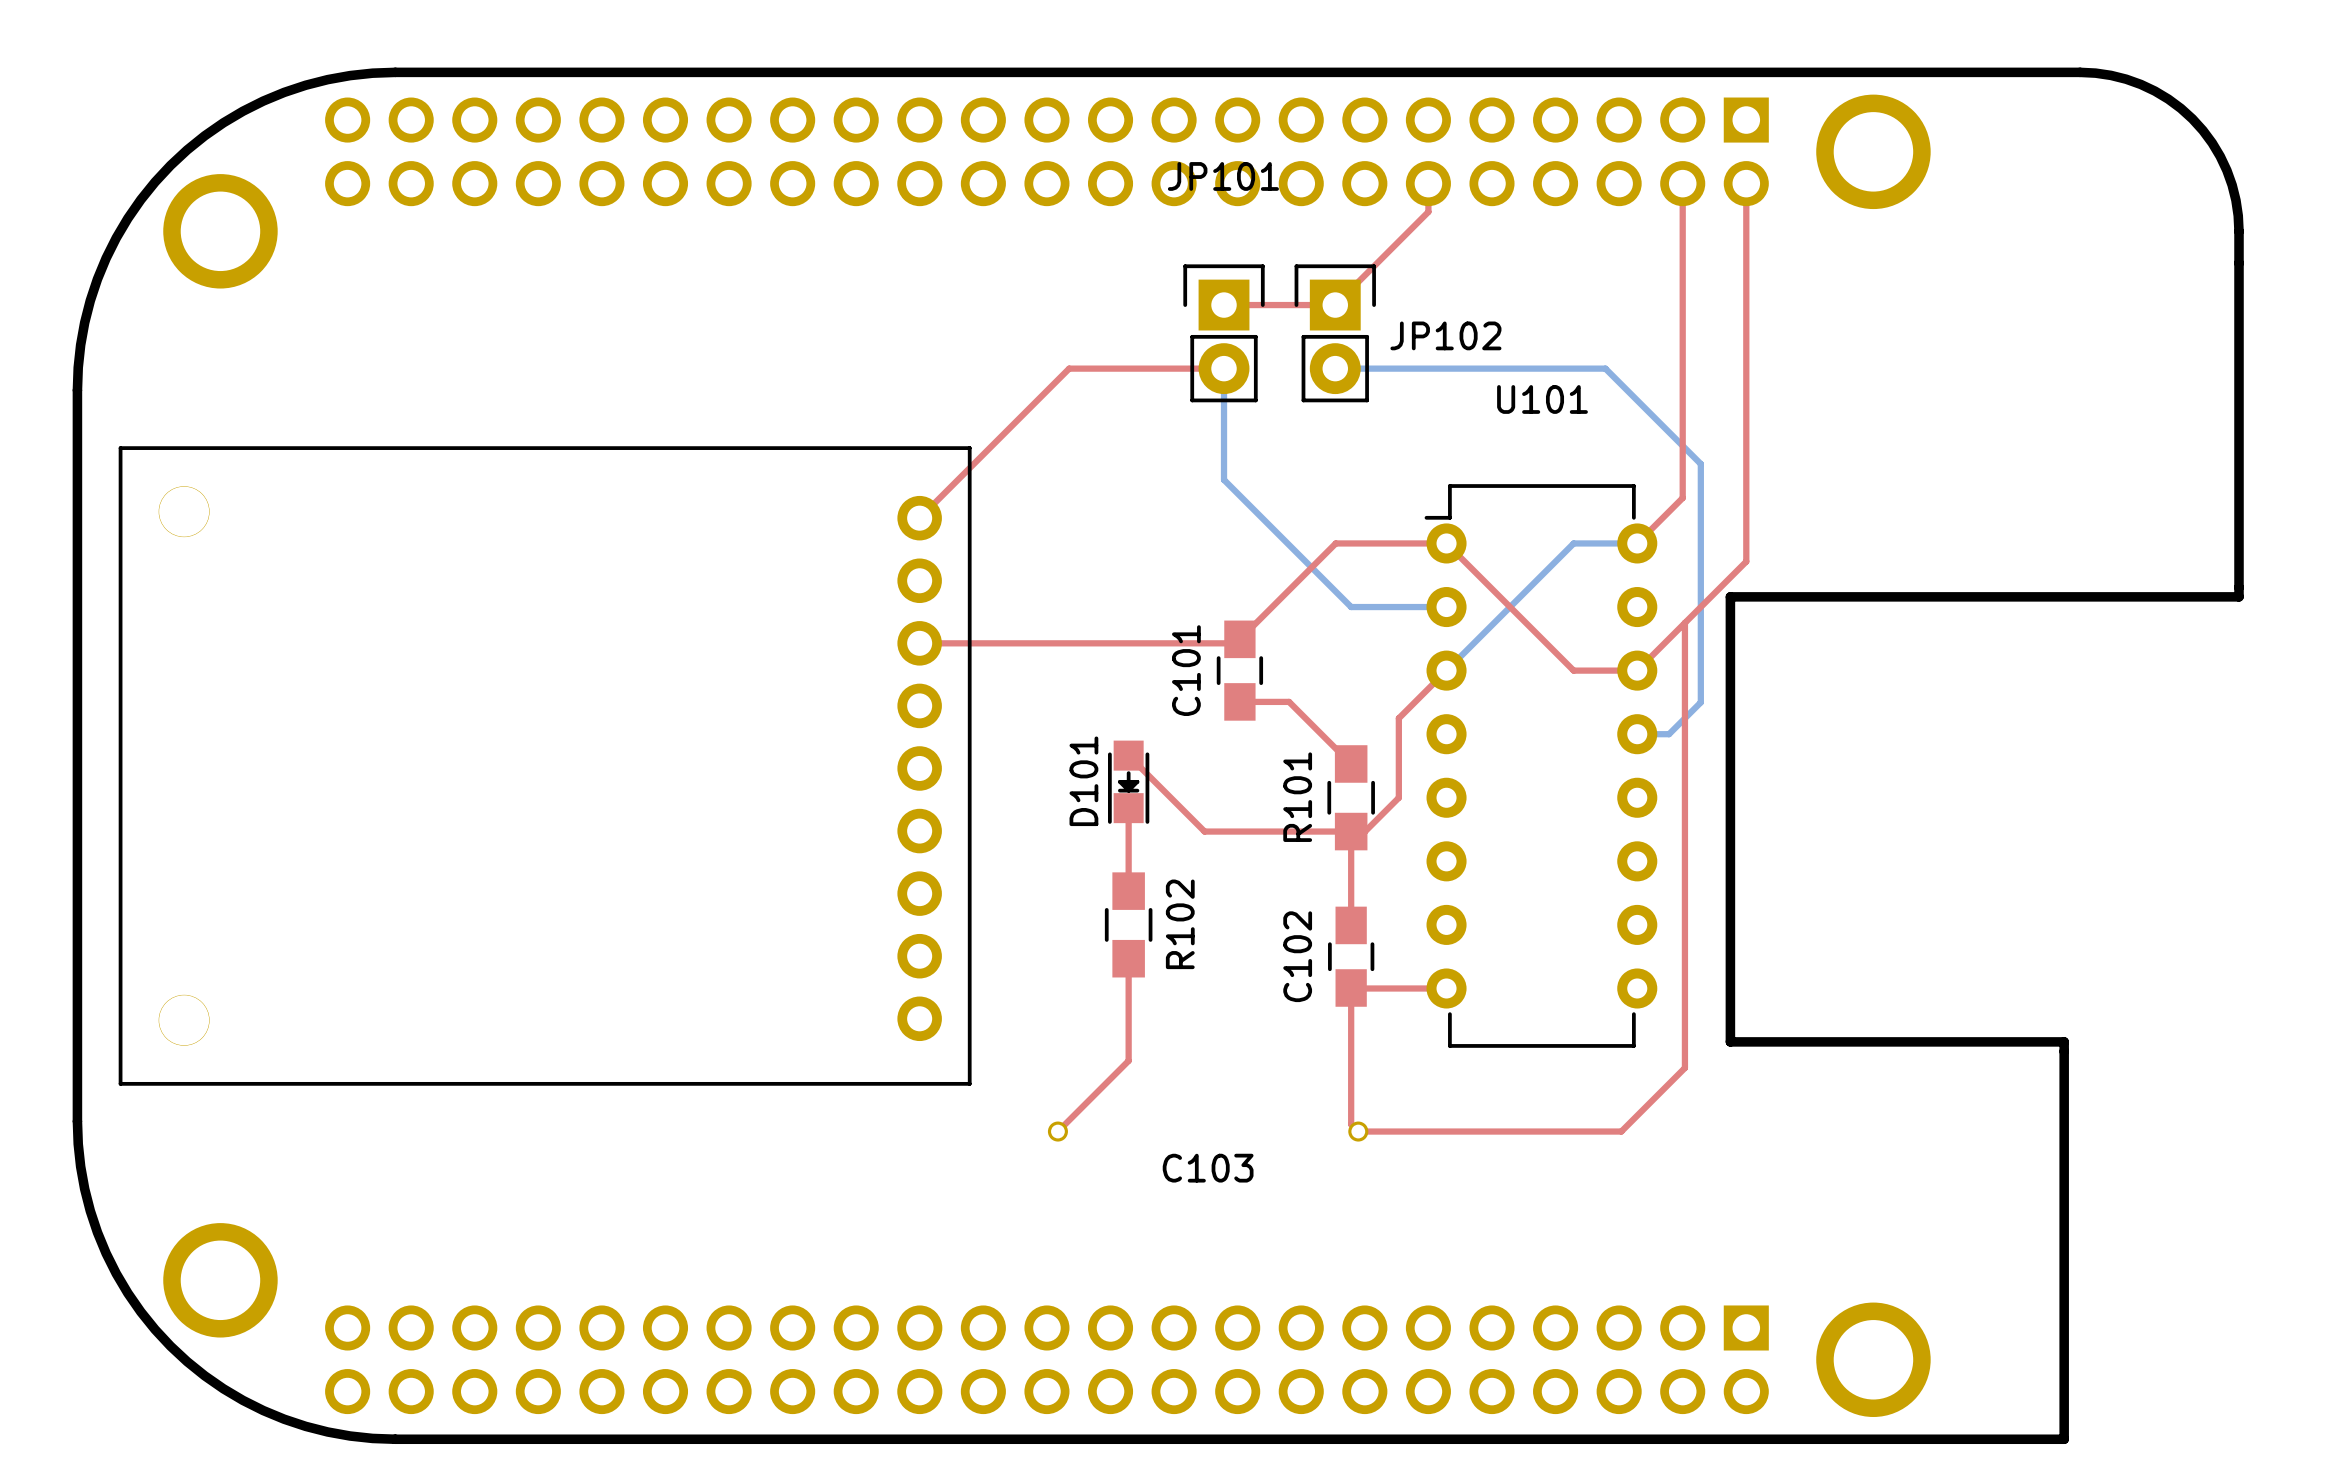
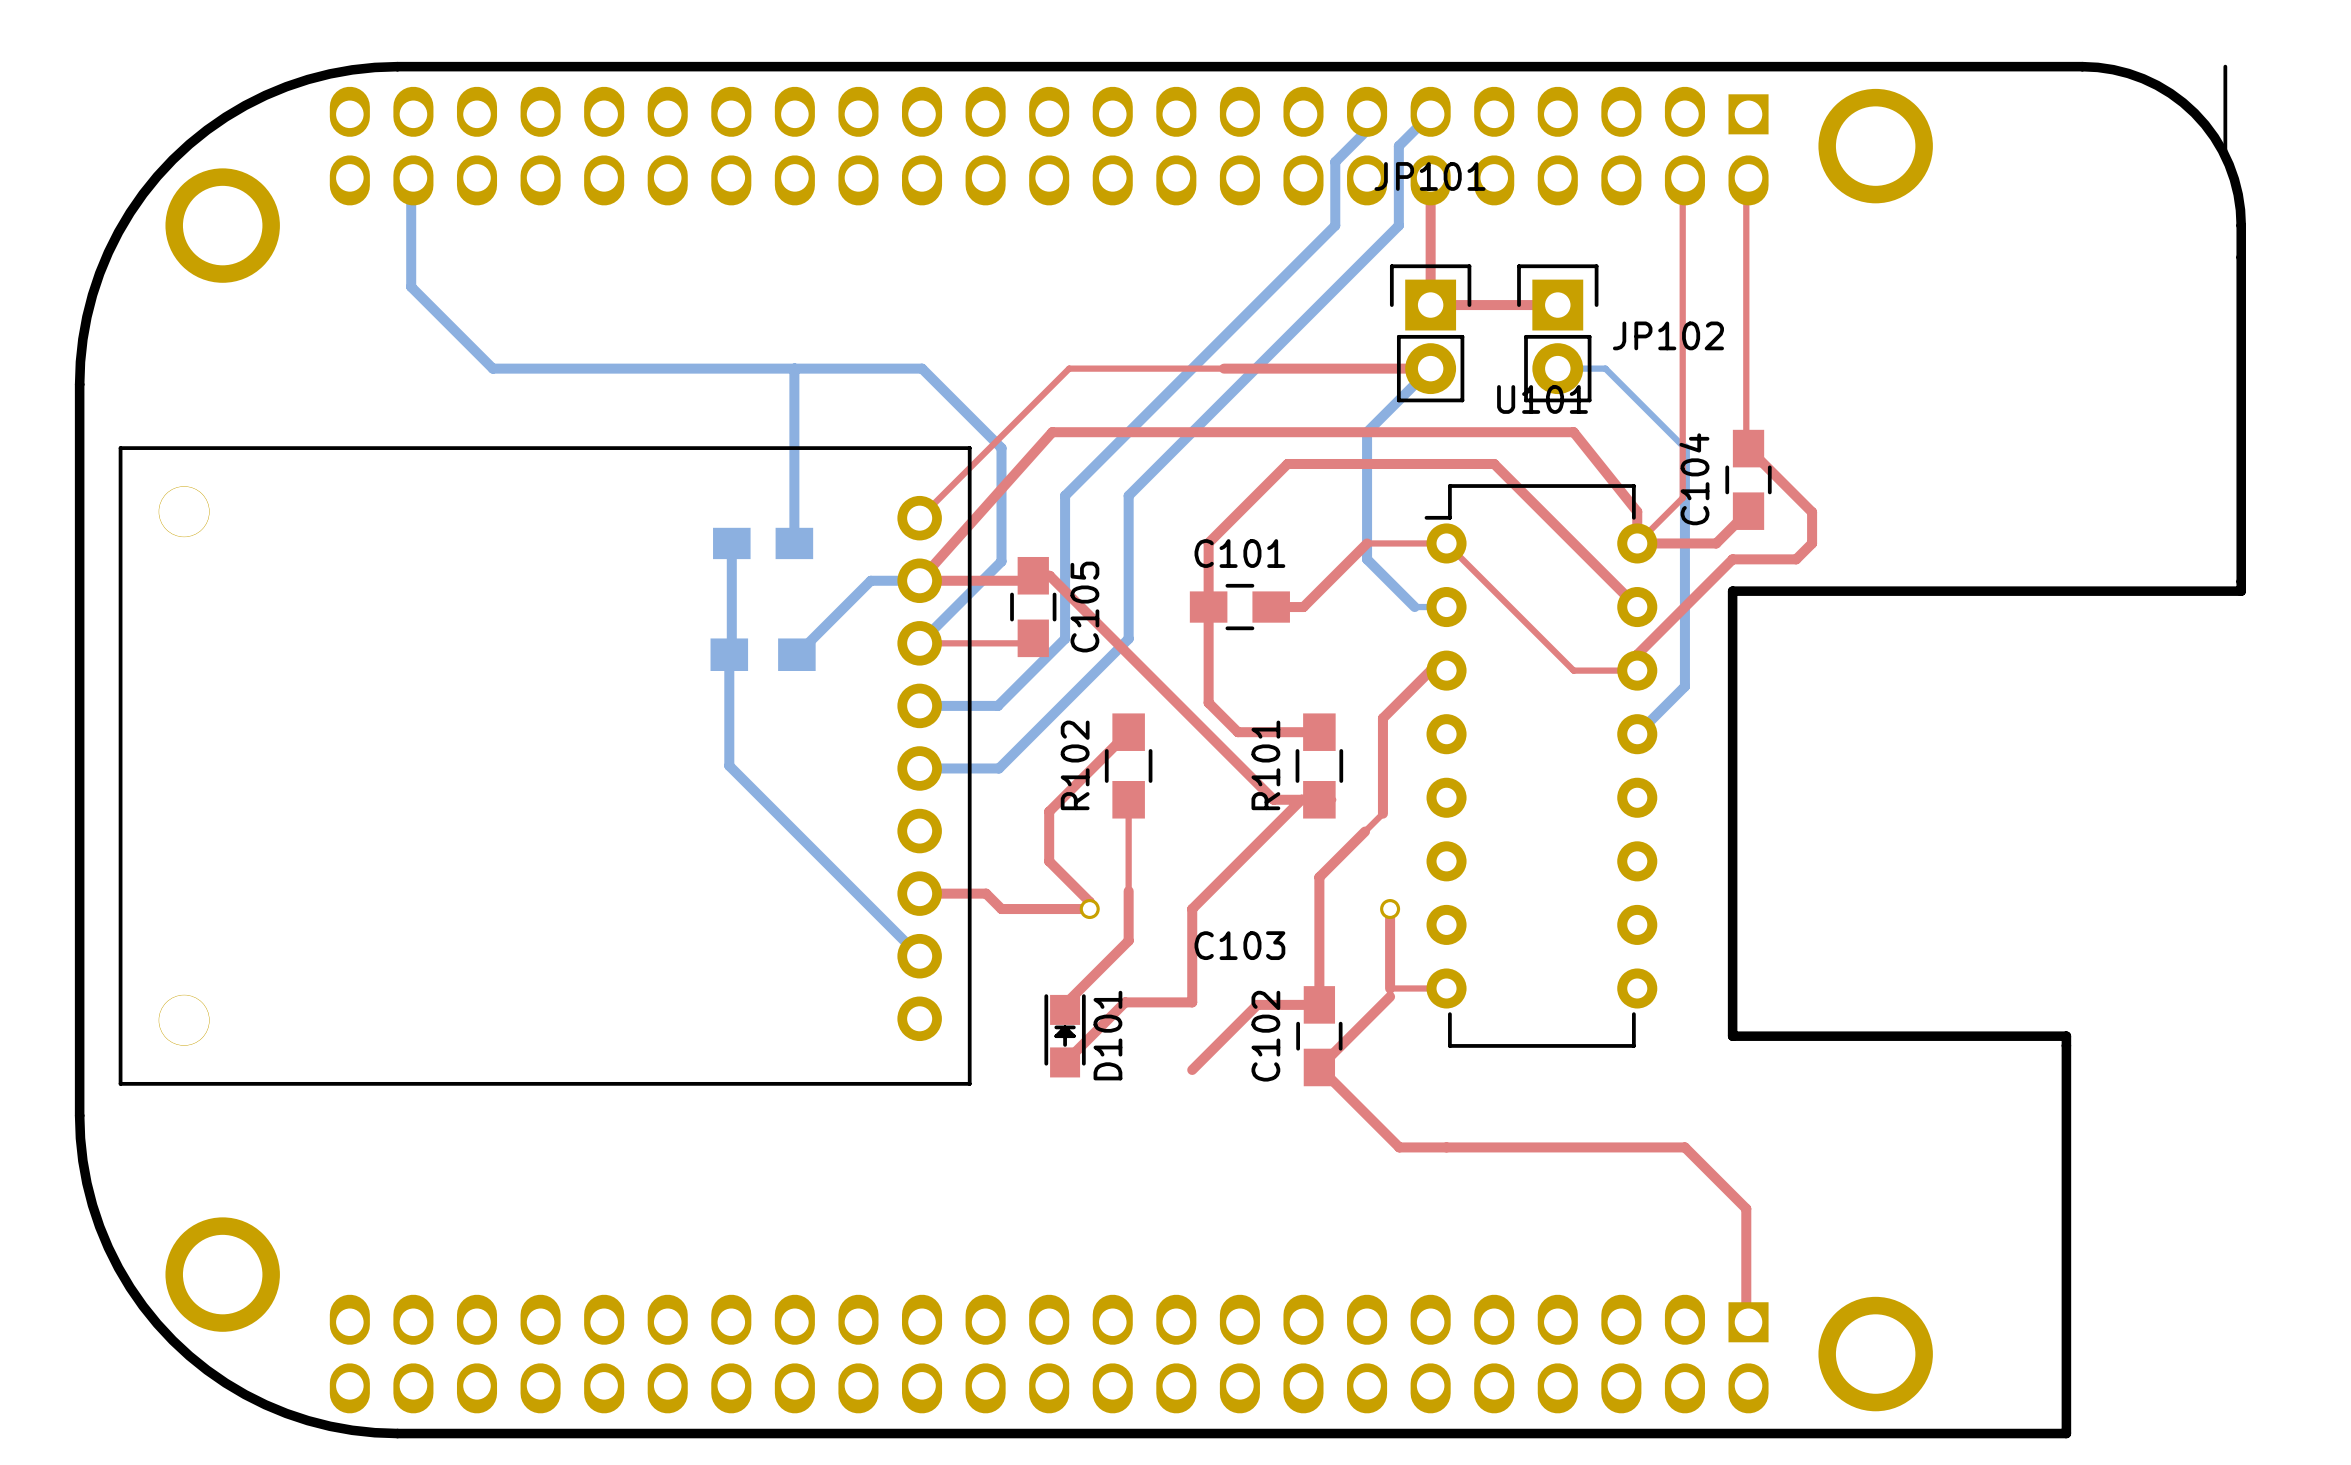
board edge: none -> (2225, 66) (2225, 162)
part footprint: [72, 67, 2244, 1445] -> [74, 61, 2247, 1439]
bottom track: none -> (1367, 114) (1367, 130) (1335, 162) (1335, 225) (1065, 495) (1065, 638) (997, 705) (919, 705)
bottom track: none -> (1430, 114) (1398, 146) (1398, 225) (1128, 495) (1128, 638) (998, 768) (919, 768)
top track: none -> (1430, 177) (1430, 305) (1557, 305)
bottom track: none -> (411, 183) (411, 286) (492, 368) (922, 368) (1001, 448) (1001, 561) (919, 643)
top track: (1428, 183) (1428, 211) (1335, 305) (1224, 305) -> none
JP101 position: (1224, 333) -> (1430, 333)
JP102 position: (1335, 333) -> (1557, 333)
bottom track: none -> (794, 368) (794, 543)
bottom track: (1224, 368) (1224, 479) (1351, 607) (1414, 607) -> (1430, 368) (1367, 432) (1367, 559) (1414, 607)
top track: none -> (1224, 368) (1430, 368)
bottom track: (1335, 368) (1557, 368) -> none
top track: (1746, 446) (1746, 561) (1637, 670) -> (1746, 446) (1812, 512) (1812, 543) (1796, 559) (1732, 559) (1637, 654) (1637, 670)
bottom track: (1684, 448) (1700, 463) (1700, 702) (1669, 734) (1637, 734) -> (1684, 448) (1684, 686) (1637, 734)
C104: none -> (1748, 479)
top track: none -> (1748, 511) (1716, 543) (1637, 543) (1637, 511) (1573, 432) (1052, 432) (919, 580) (1028, 580) (1033, 575) (1049, 575) (1273, 799) (1333, 799)
bottom track: none -> (731, 543) (729, 765) (919, 956)
part: none -> (763, 543)
top track: (1367, 543) (1335, 543) (1235, 643) (1028, 643) -> (1367, 543) (1303, 607) (1271, 607)
bottom track: (1637, 543) (1573, 543) (1446, 670) -> none
bottom track: none -> (919, 580) (870, 580) (796, 654)
C105: none -> (1033, 607)
top track: none -> (1637, 607) (1494, 463) (1287, 463) (1208, 542) (1208, 702) (1237, 732) (1319, 732)
top track: (1684, 622) (1684, 1067) (1621, 1131) (1358, 1131) (1351, 1124) (1351, 987) (1390, 988) -> none
part: none -> (763, 654)
C101 rotation: 0° (1239, 670) -> 90° clockwise (1239, 607)
C101 position: (1239, 670) -> (1239, 607)
top track: (1446, 670) (1398, 718) (1398, 797) (1382, 813) -> (1446, 670) (1430, 670) (1382, 718) (1382, 813)
top track: (1239, 701) (1289, 701) (1351, 763) -> none
top track: none -> (1128, 732) (1049, 811) (1049, 861) (1089, 901) (1089, 909) (1001, 909) (986, 893) (919, 893)
top track: (1128, 755) (1204, 831) (1365, 831) -> (1192, 1069) (1257, 1004) (1319, 1004) (1319, 877) (1365, 831)
D101 rotation: 0° (1128, 782) -> 180° (1065, 1035)
D101 position: (1128, 782) -> (1065, 1035)
R101 position: (1351, 797) -> (1319, 765)
top track: none -> (1301, 799) (1192, 909) (1192, 1002) (1125, 1002) (1065, 1062)
top track: (1351, 831) (1351, 925) -> none
top track: none -> (1128, 891) (1128, 940) (1065, 1004) (1065, 1009)
top track: none -> (1390, 909) (1390, 996) (1319, 1067)
R102 position: (1128, 924) -> (1128, 765)
R102 name position: R102 (1180, 924) -> R102 (1075, 765)
C102 position: (1351, 956) -> (1319, 1036)
top track: (1128, 958) (1128, 1060) (1057, 1131) -> none
top track: none -> (1319, 1067) (1399, 1147) (1684, 1147) (1746, 1208) (1746, 1327) (1738, 1327)
C103 position: (1208, 1131) -> (1239, 909)

